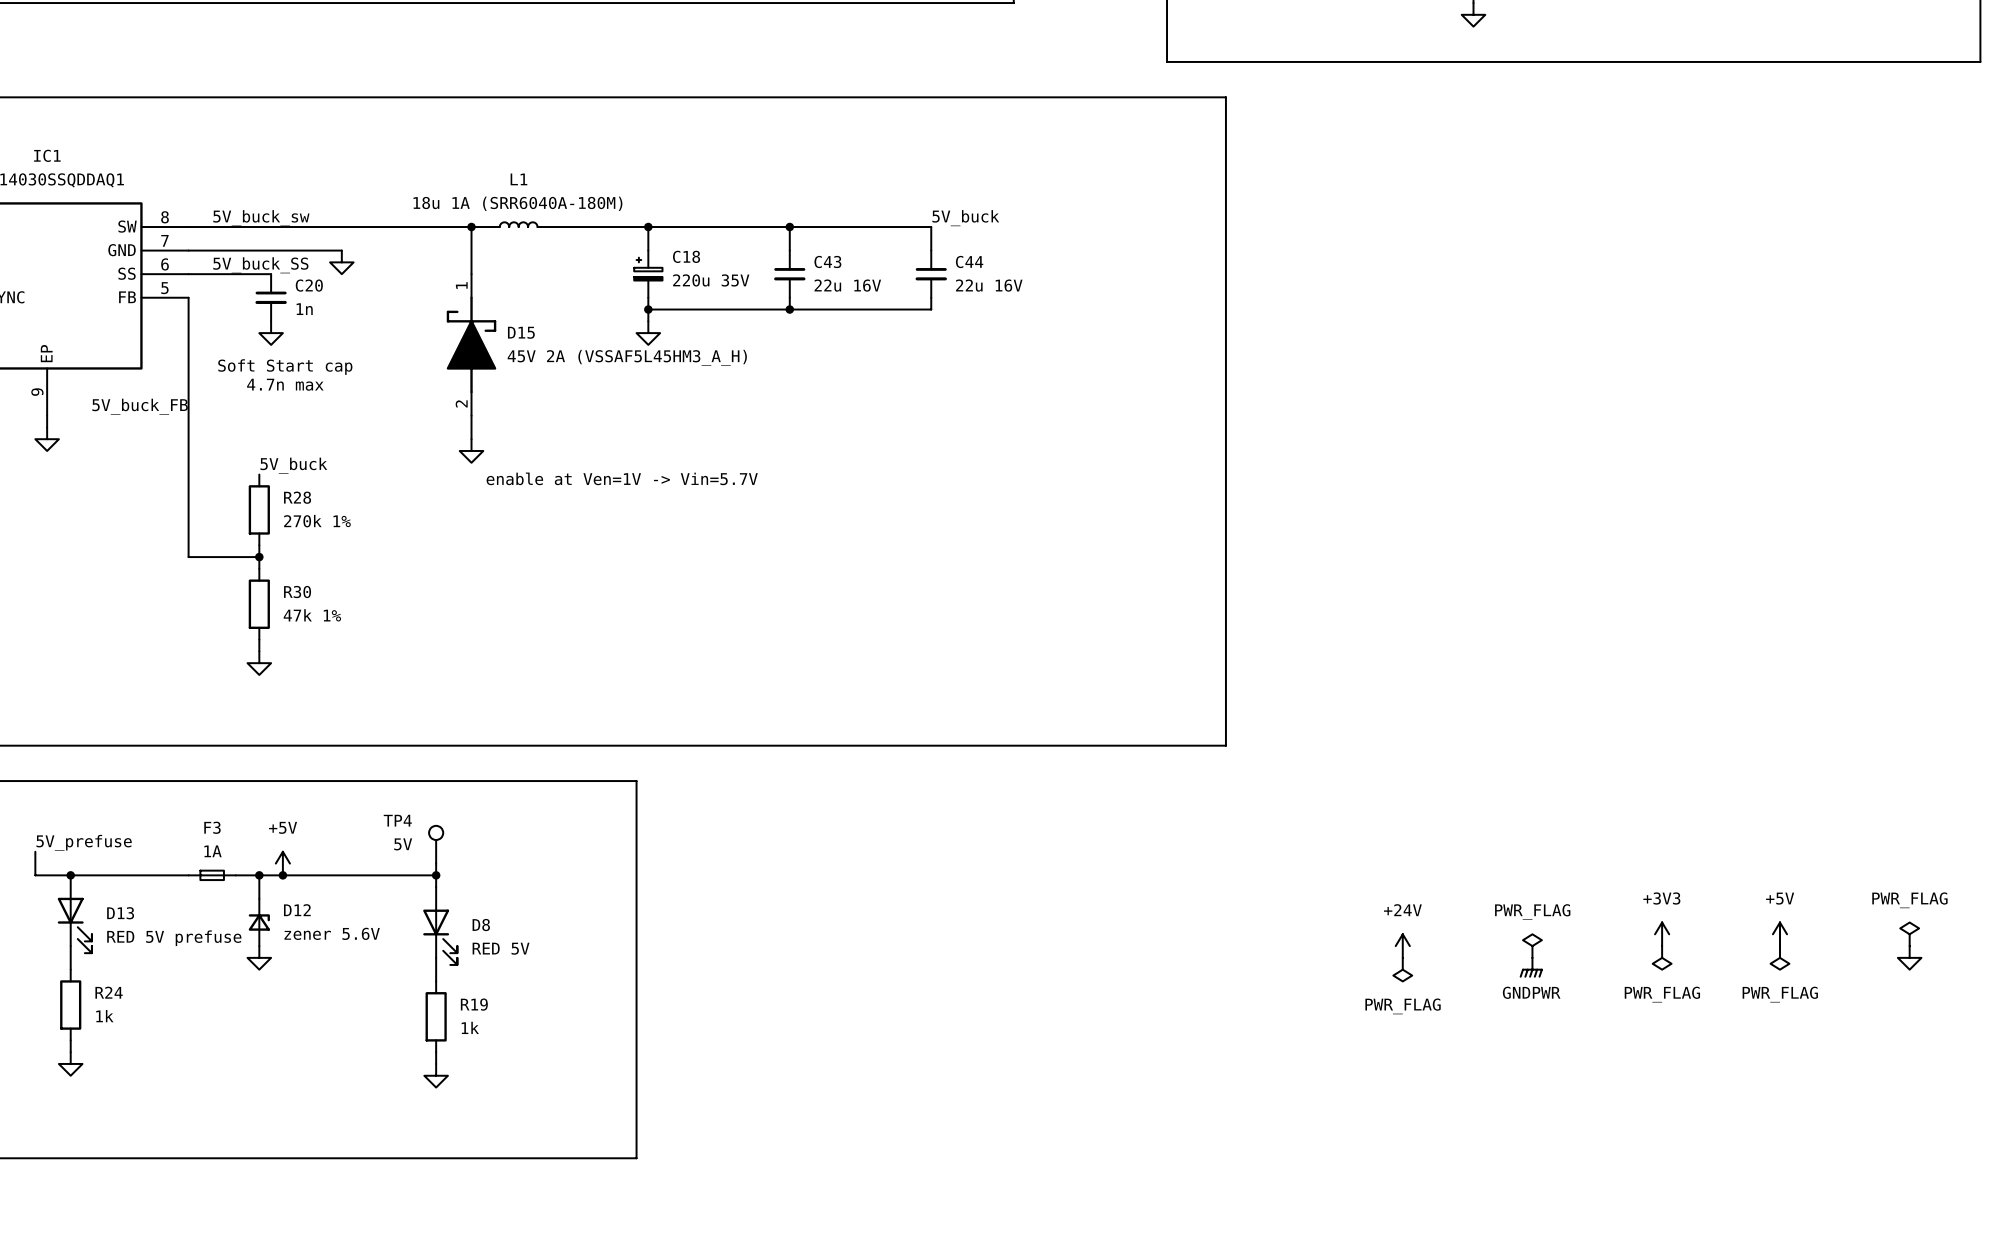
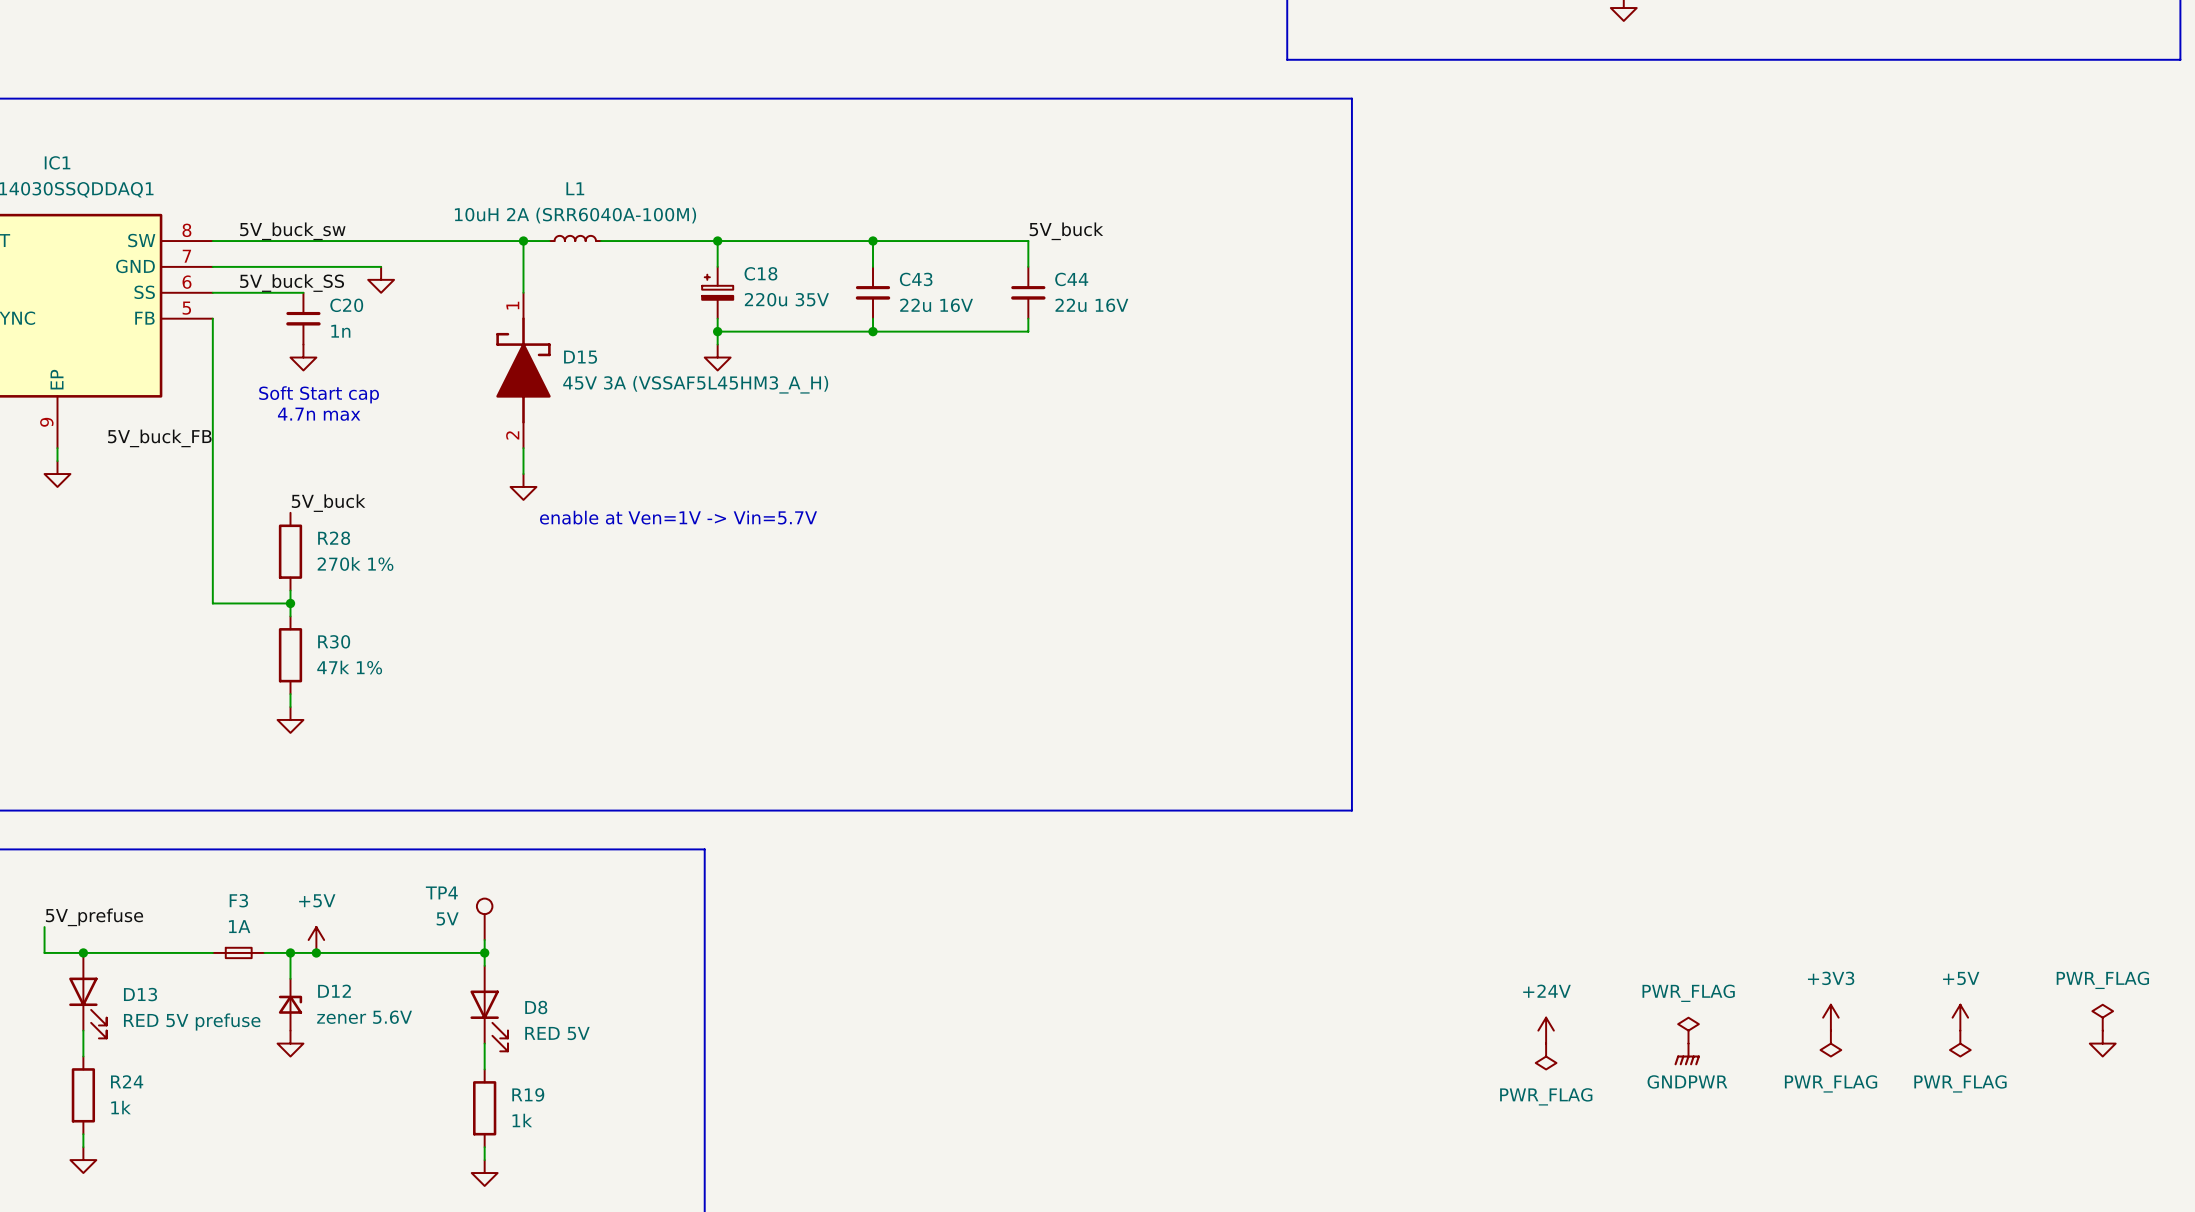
L1 value: 18u 1A (SRR6040A-180M) (517, 203) -> 10uH 2A (SRR6040A-100M) (575, 215)
D15 value: 45V 2A (VSSAF5L45HM3_A_H) (627, 357) -> 45V 3A (VSSAF5L45HM3_A_H) (695, 384)

